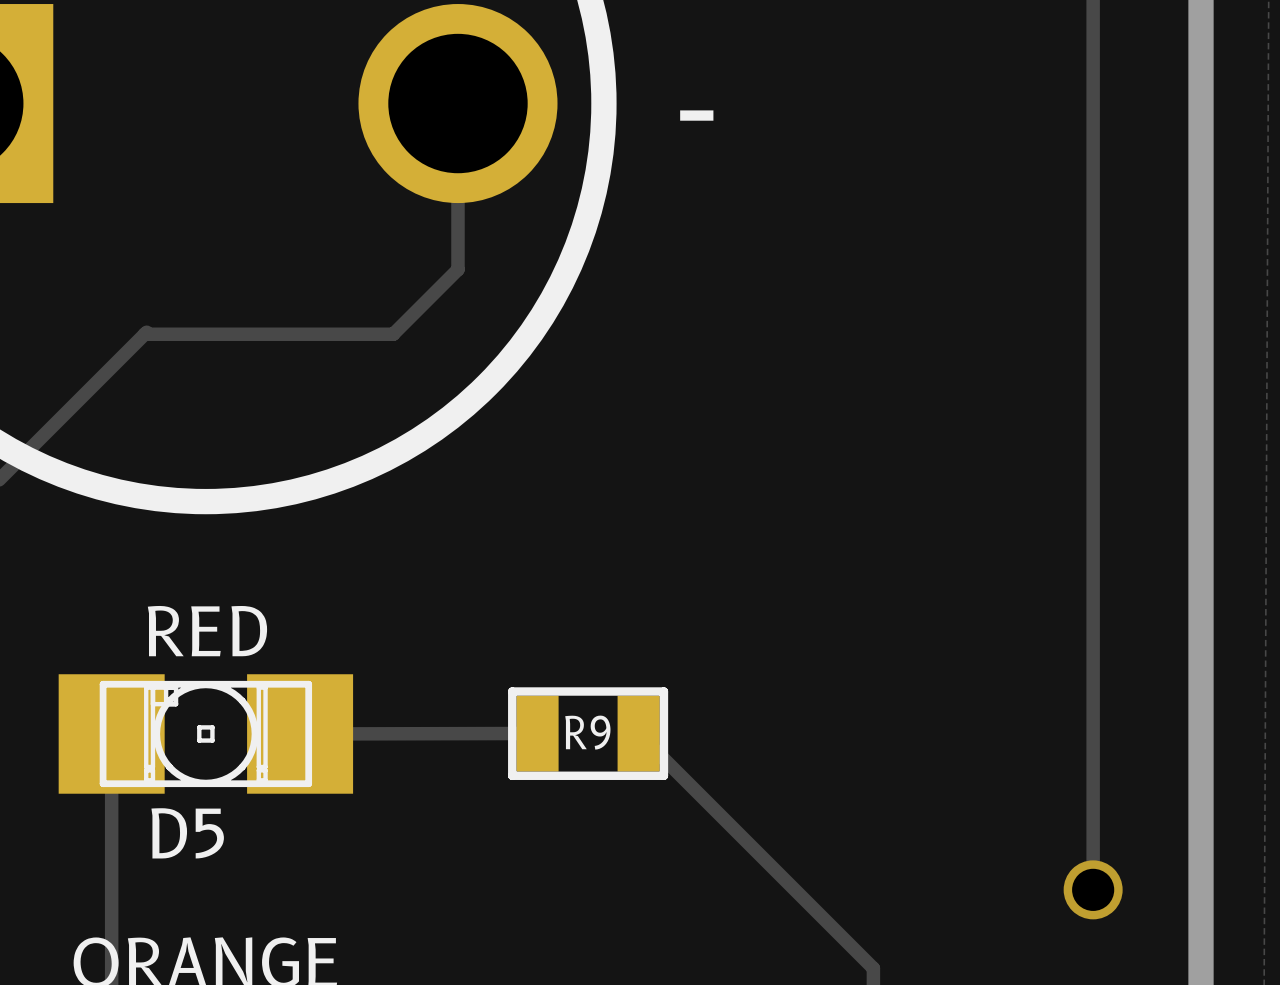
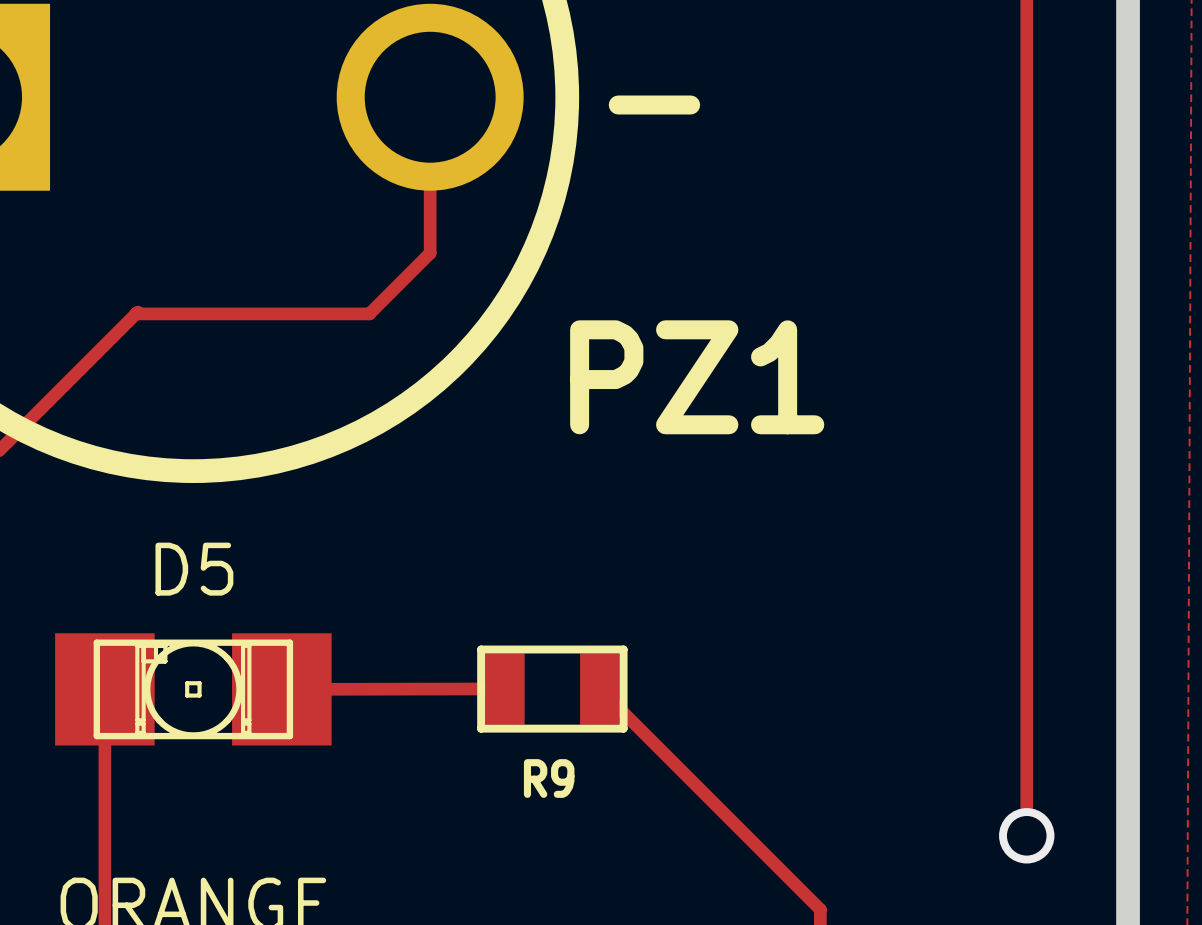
PZ1 name: none -> PZ1 (697, 377)
D5 value: RED (207, 631) -> none
R9 name position: R9 (587, 732) -> R9 (549, 778)
D5 name position: D5 (187, 833) -> D5 (194, 569)

